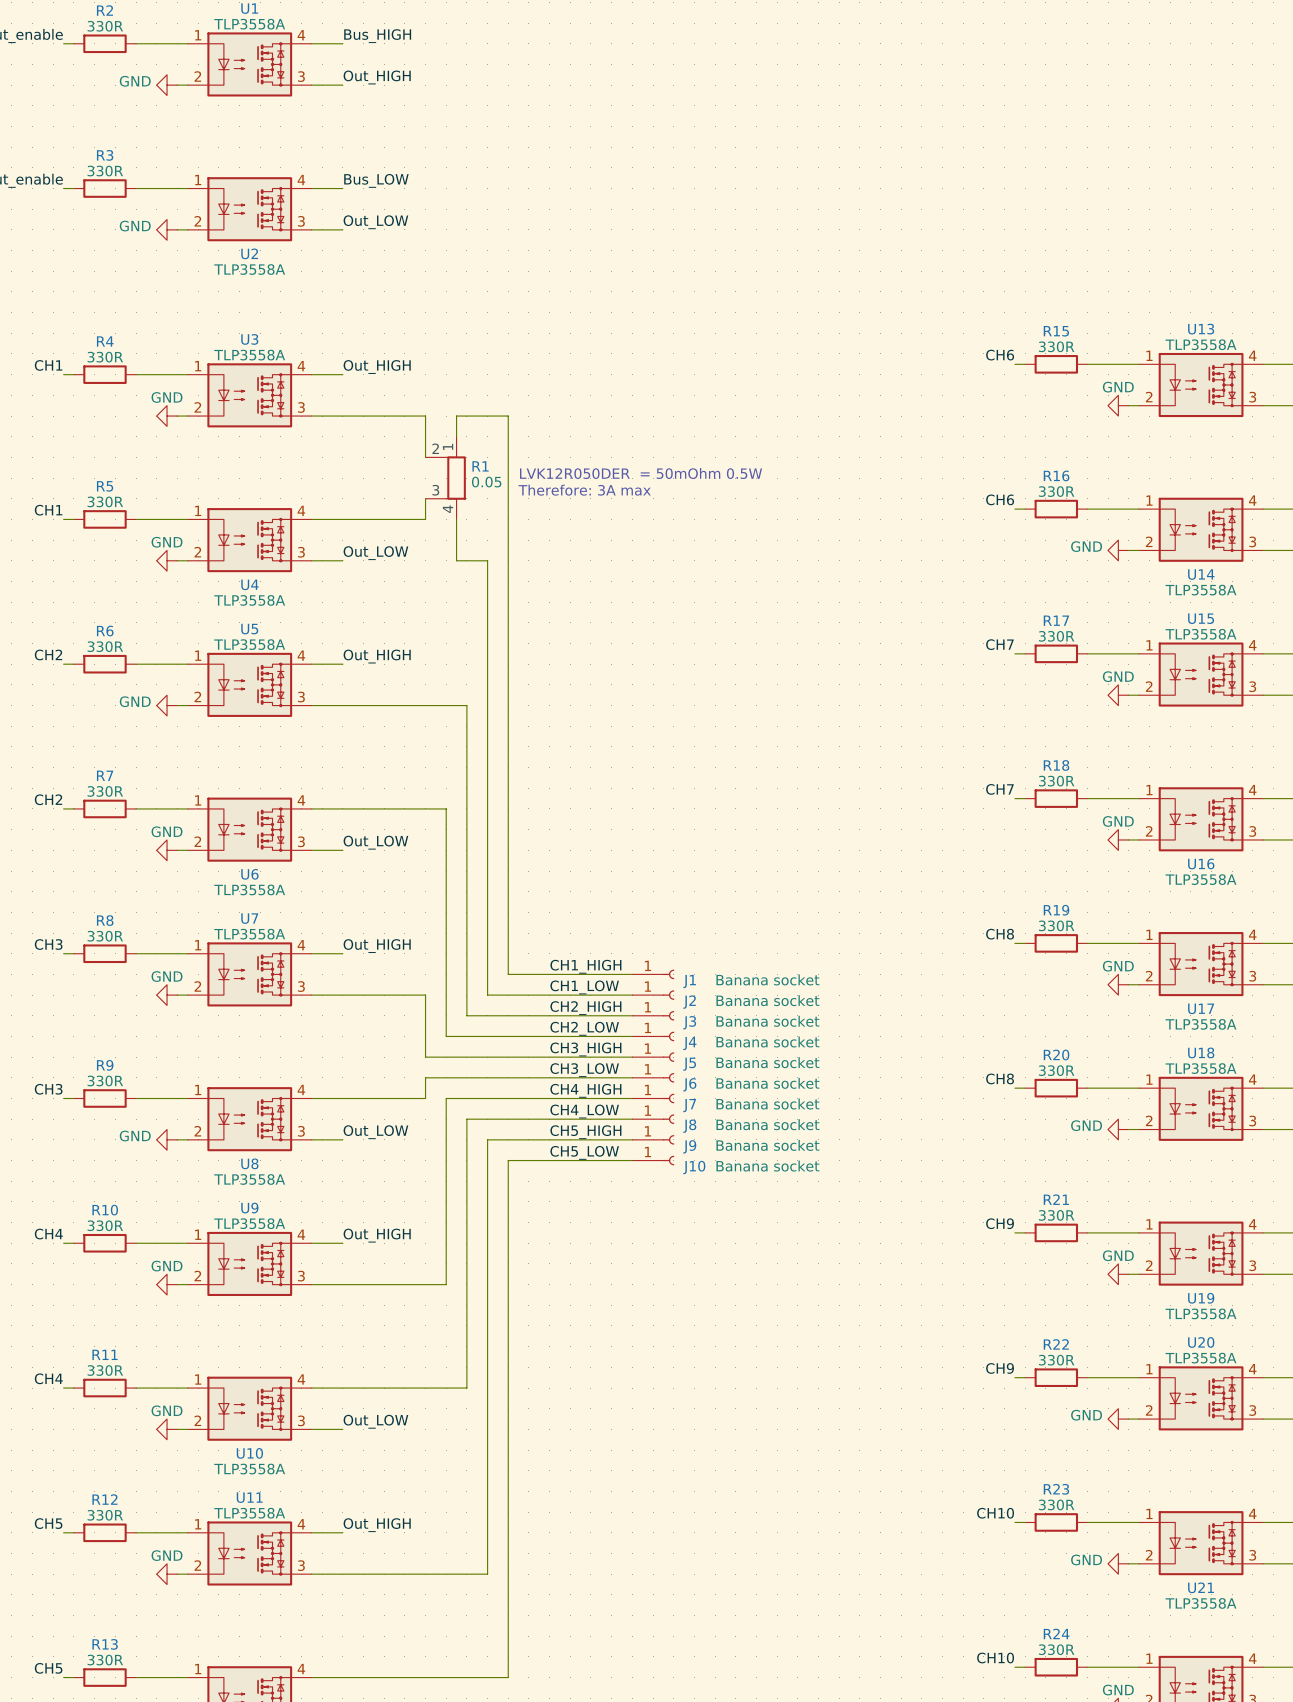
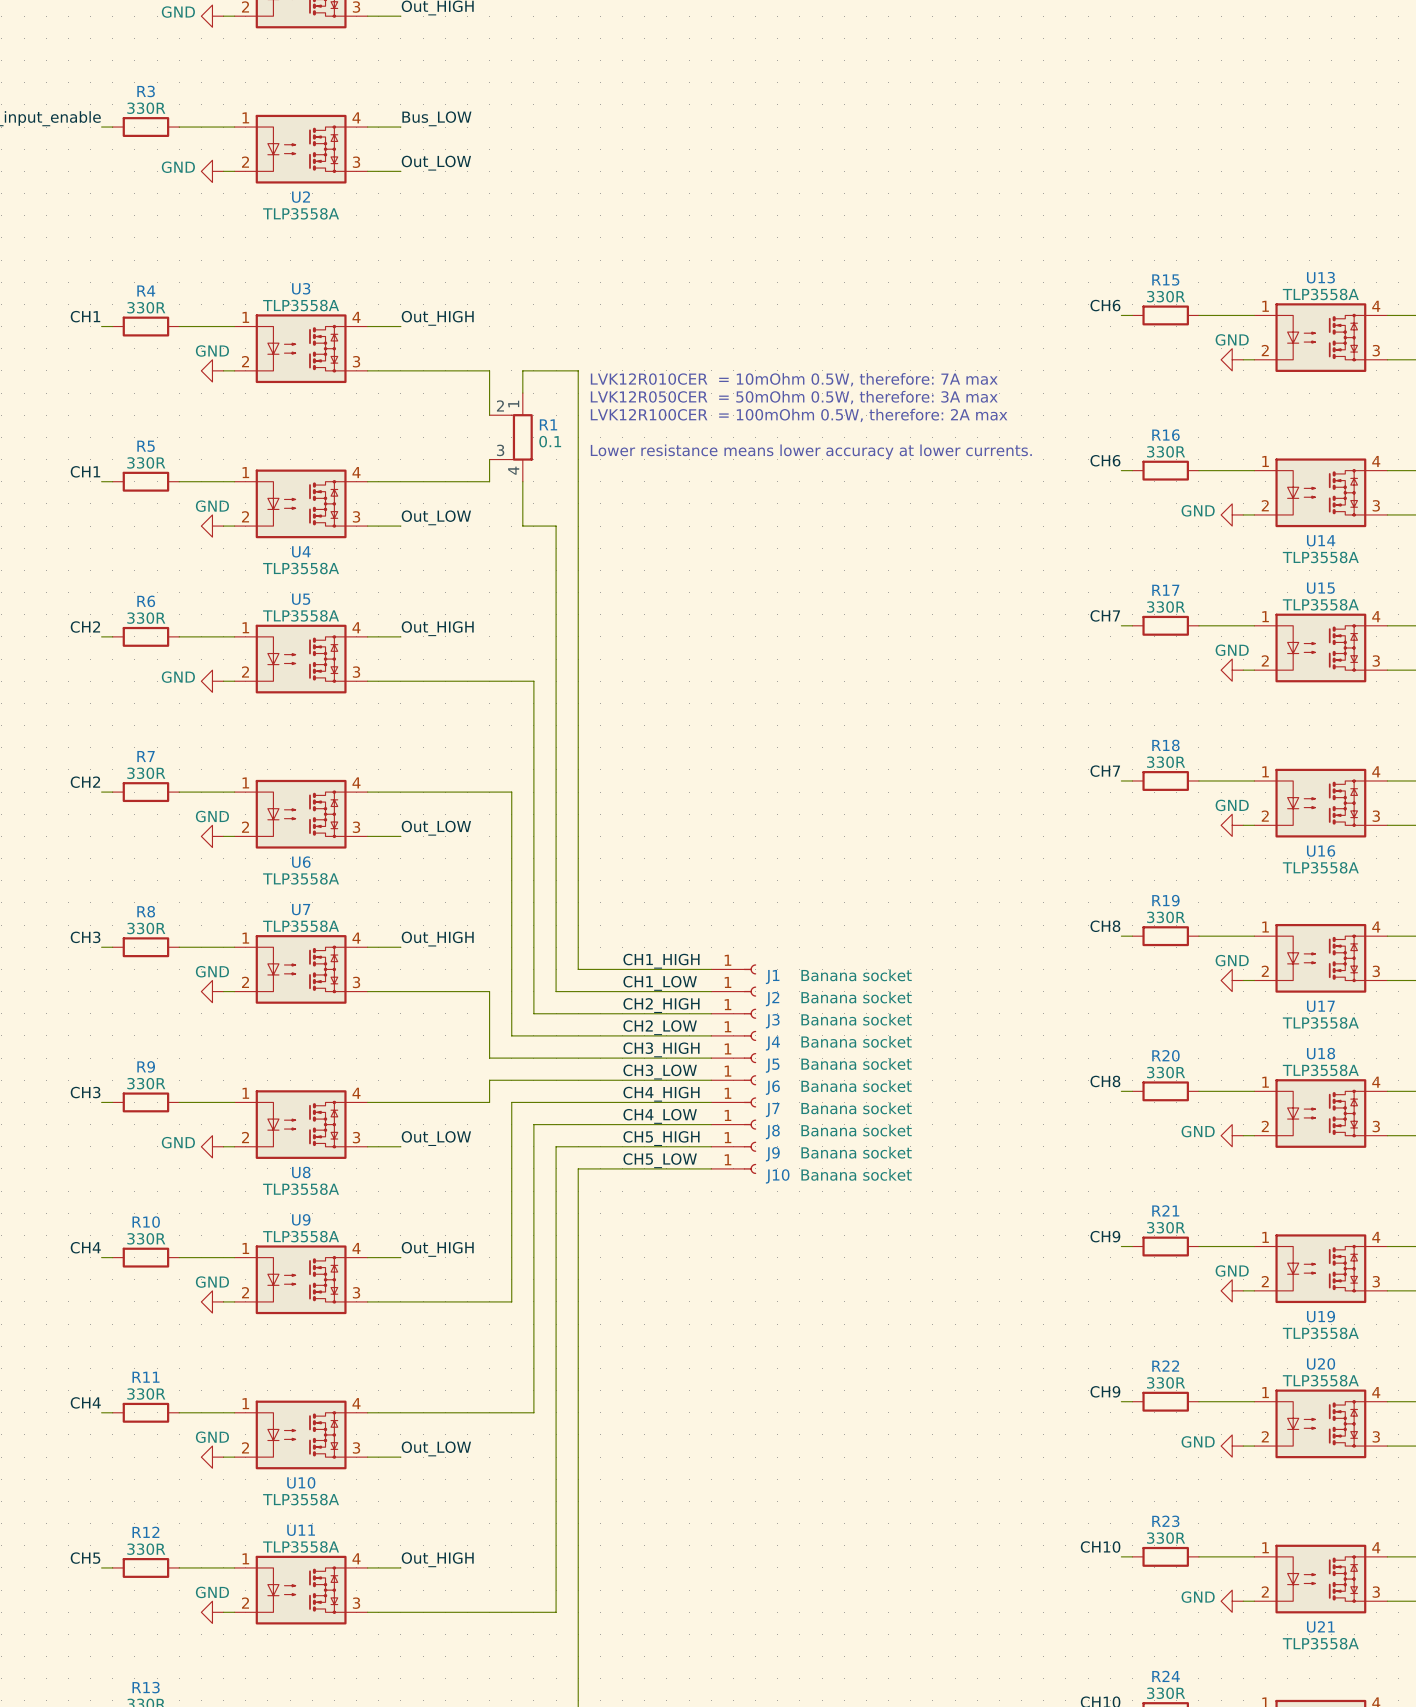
text: none -> LVK12R010CER = 10mOhm 0.5W, therefore: 7A max (794, 379)
text: none -> LVK12R050CER = 50mOhm 0.5W, therefore: 3A max (794, 397)
text: LVK12R050DER = 50mOhm 0.5W (641, 473) -> LVK12R100CER = 100mOhm 0.5W, therefore: 2A max (799, 415)
R1 value: 0.05 (486, 482) -> 0.1 (550, 441)
text: Therefore: 3A max (584, 490) -> Lower resistance means lower accuracy at lower currents. (811, 451)

